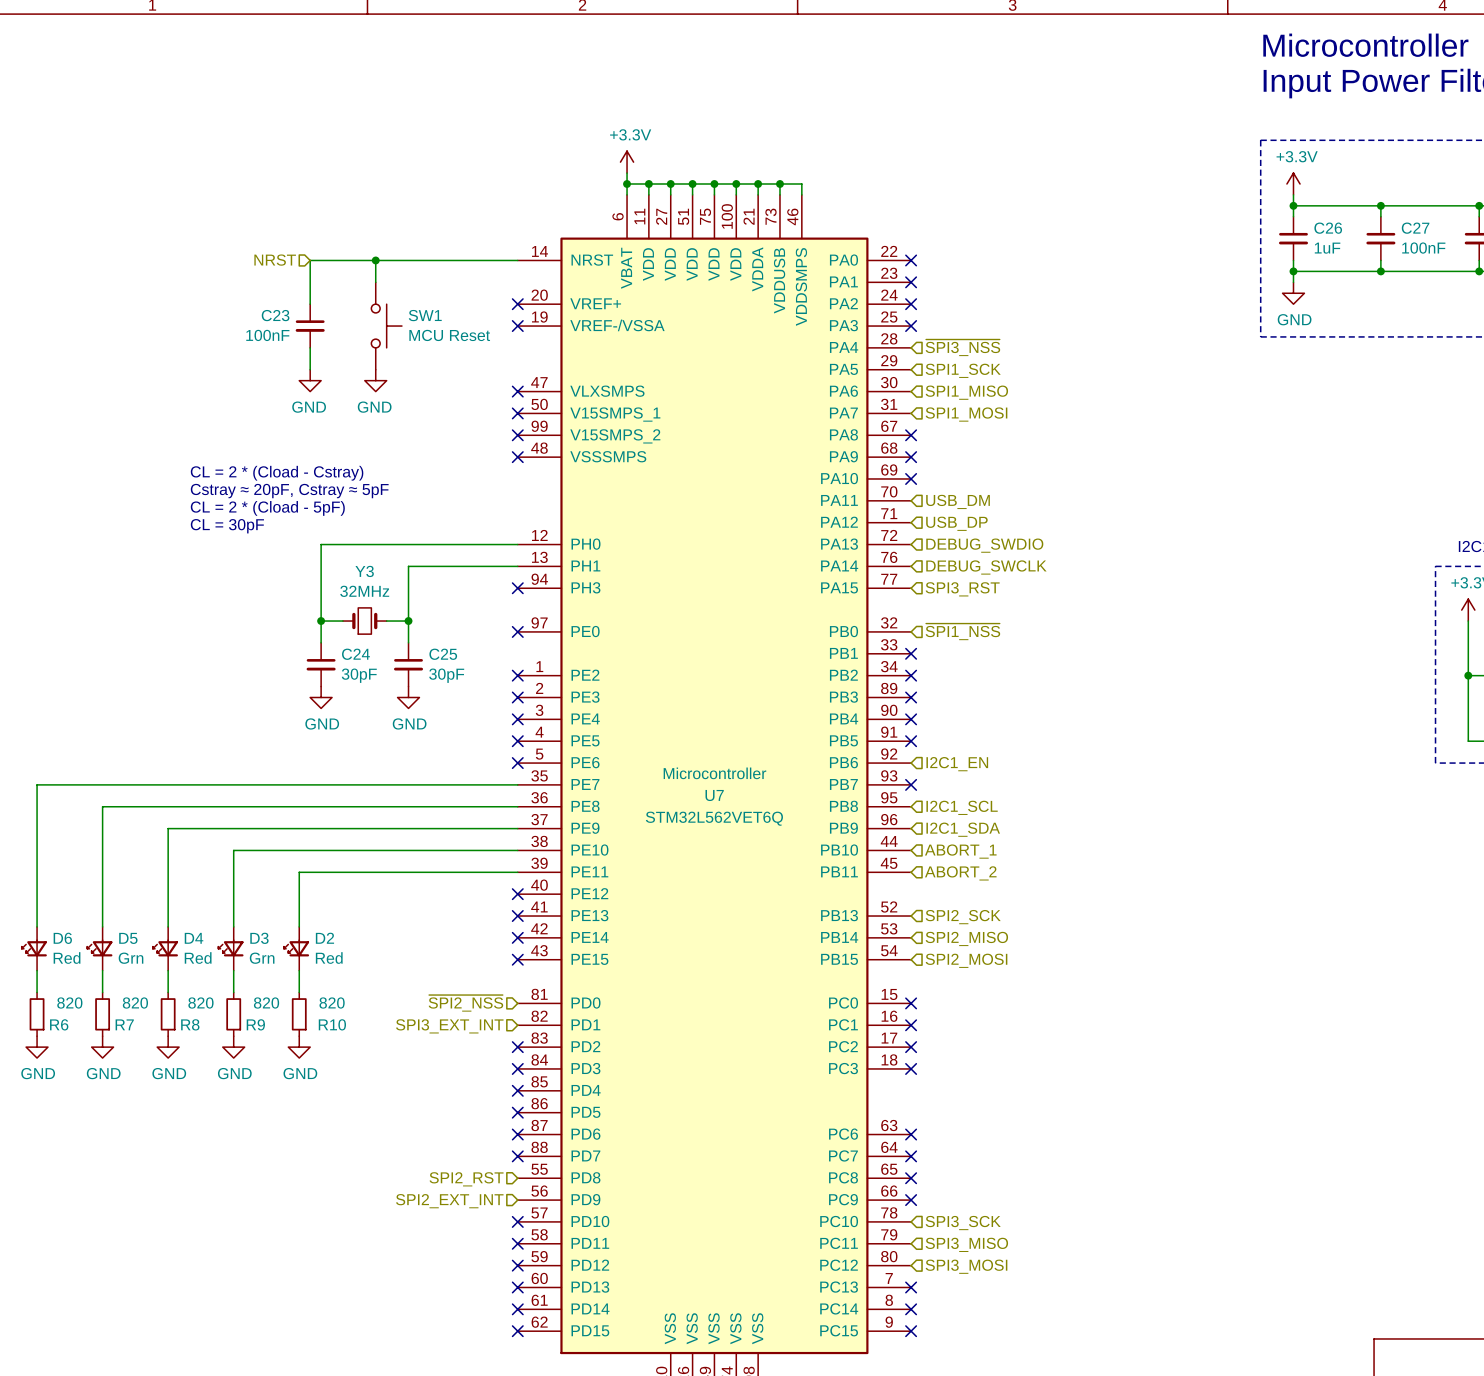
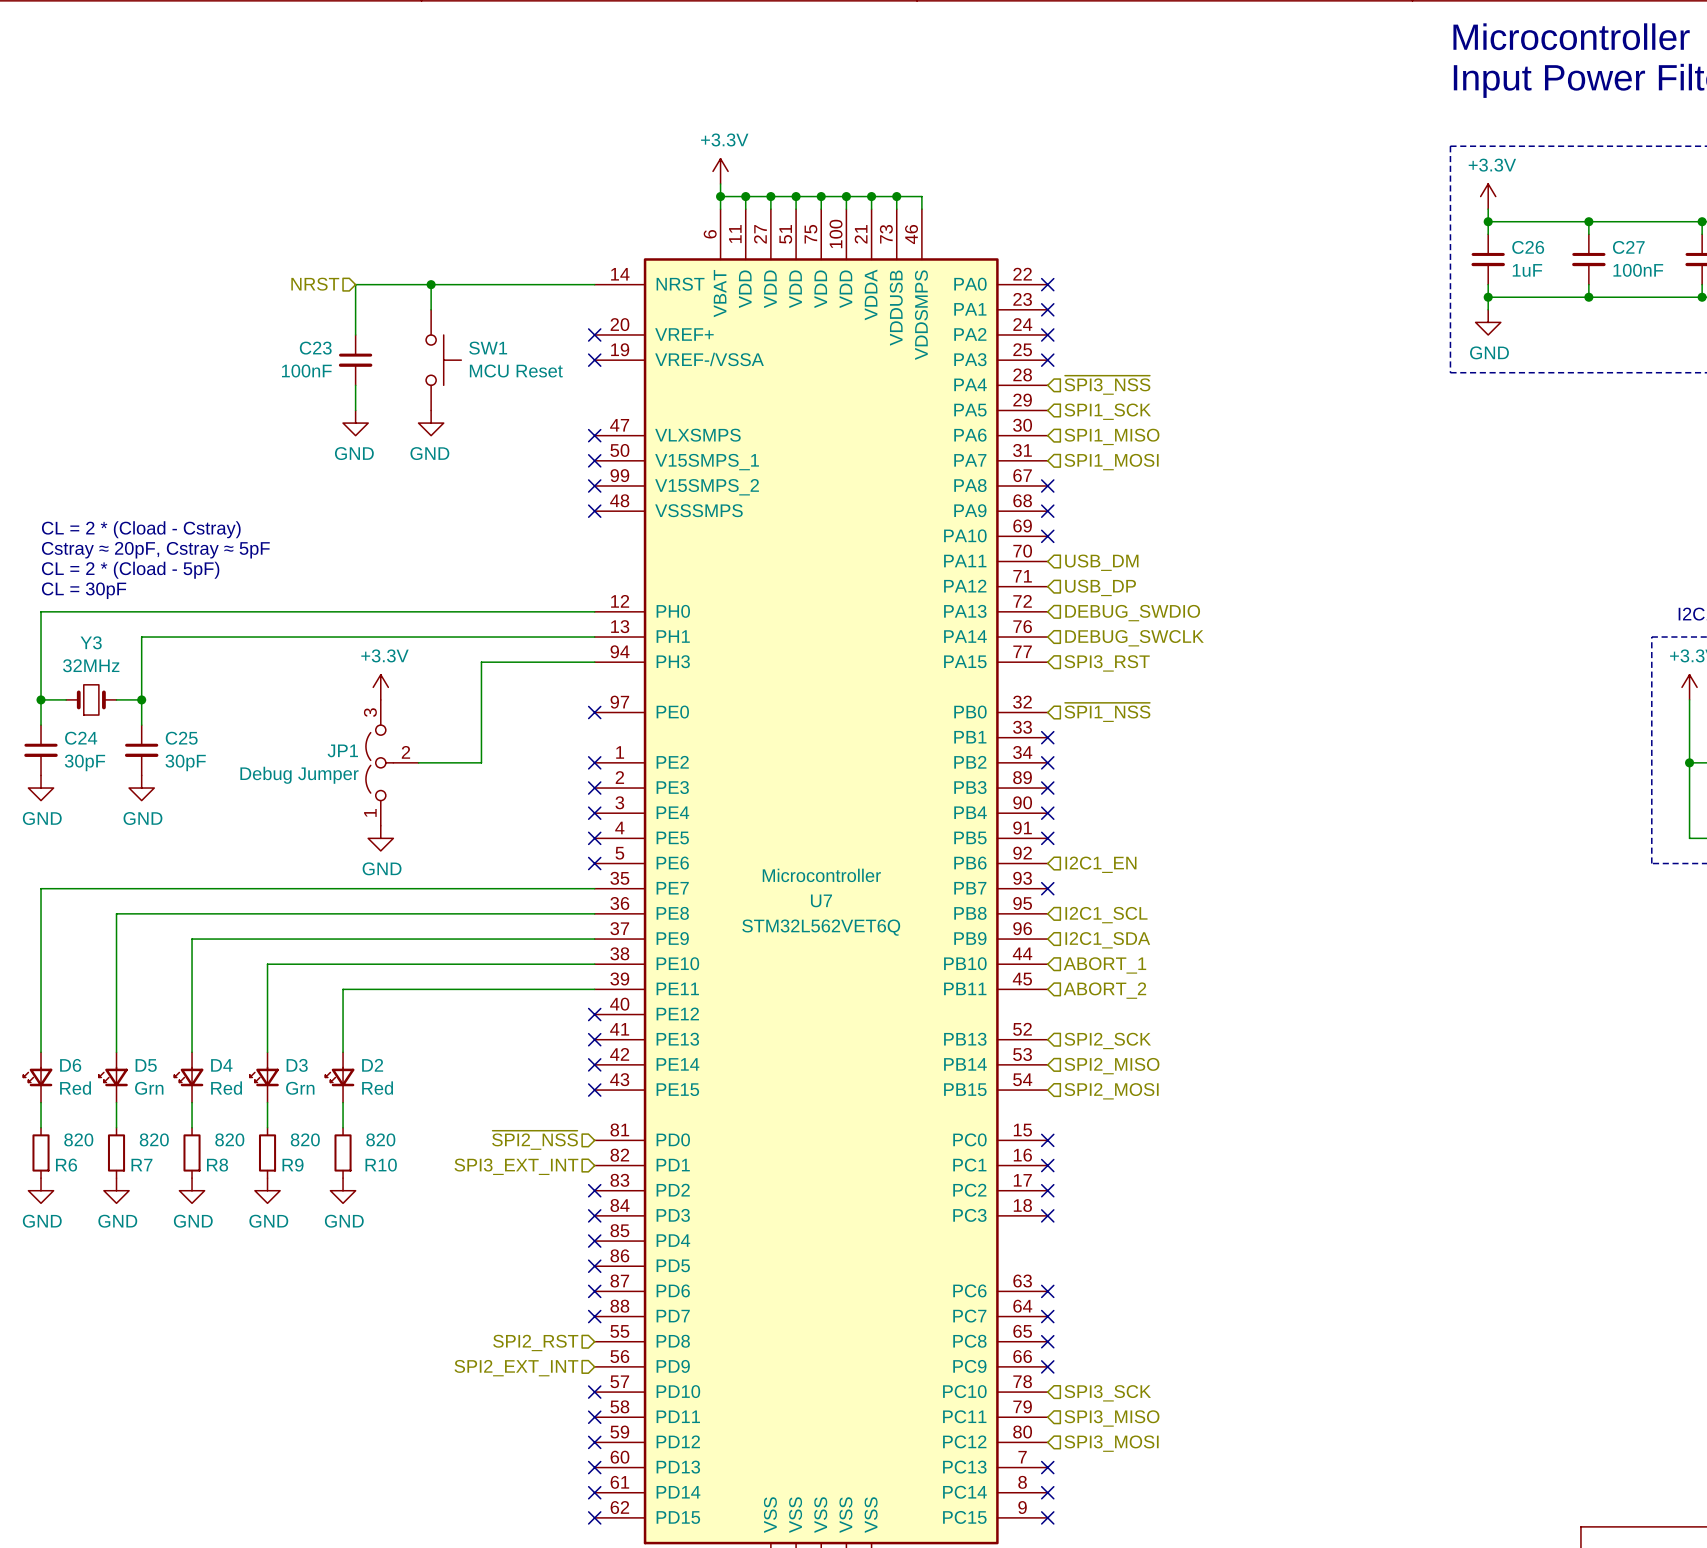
text position: CL = 2 * (Cload - Cstray) (277, 473) -> CL = 2 * (Cload - Cstray) (141, 529)
text position: Cstray ≈ 20pF, Cstray ≈ 5pF (289, 491) -> Cstray ≈ 20pF, Cstray ≈ 5pF (155, 550)
text position: CL = 2 * (Cload - 5pF) (267, 508) -> CL = 2 * (Cload - 5pF) (130, 570)
text position: CL = 30pF (227, 526) -> CL = 30pF (84, 590)
wire: (321, 544) (321, 642) -> (368, 611) (41, 611) (41, 725)
wire: (408, 566) (408, 642) -> (468, 637) (141, 637) (141, 725)
wire: none -> (594, 662) (481, 662) (481, 762) (418, 762)
no-connect mark: (517, 588) -> none
power symbol: none -> +3.3V (380, 687)
wire: none -> (41, 699) (66, 699)
junction: none -> (41, 699)
wire: none -> (116, 699) (141, 699)
junction: none -> (141, 699)
wire: (321, 621) (342, 621) -> none
junction: (321, 621) -> none
Y3 position: (364, 621) -> (91, 699)
wire: (386, 621) (408, 621) -> none
junction: (408, 621) -> none
C24 position: (321, 664) -> (41, 750)
C25 position: (408, 664) -> (141, 750)
JP1: none -> Debug Jumper (392, 762)
power symbol: none -> GND (41, 788)
power symbol: none -> GND (141, 788)
power symbol: GND (321, 697) -> none
power symbol: GND (408, 697) -> none
power symbol: none -> GND (380, 838)

